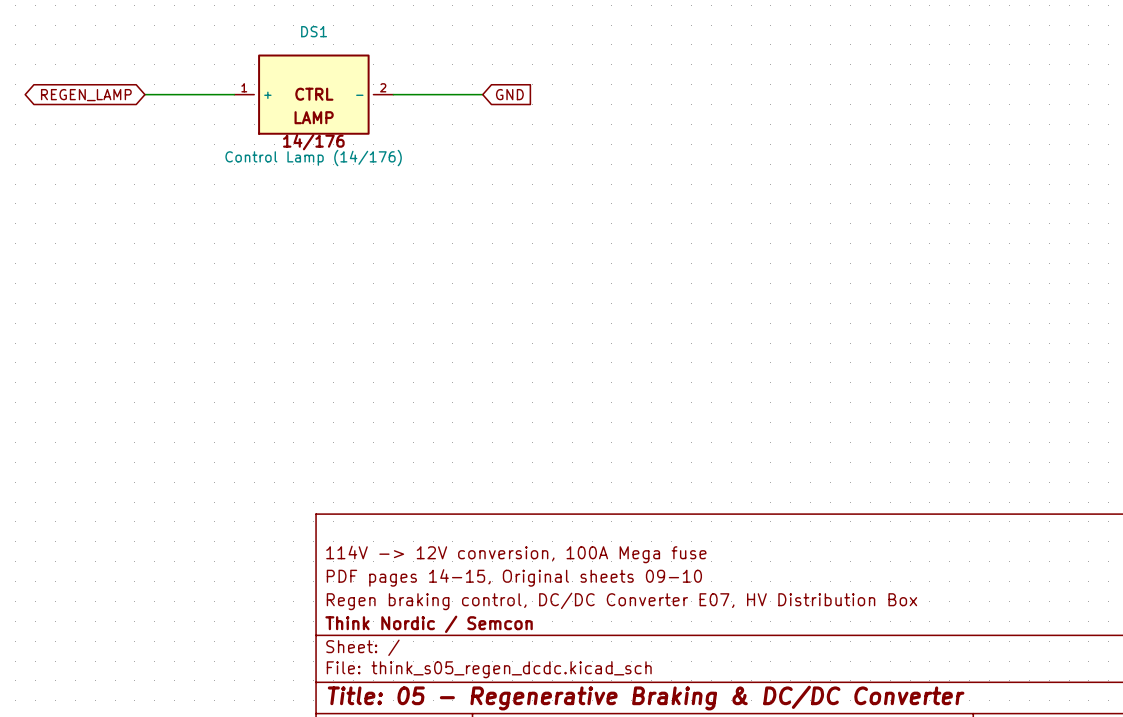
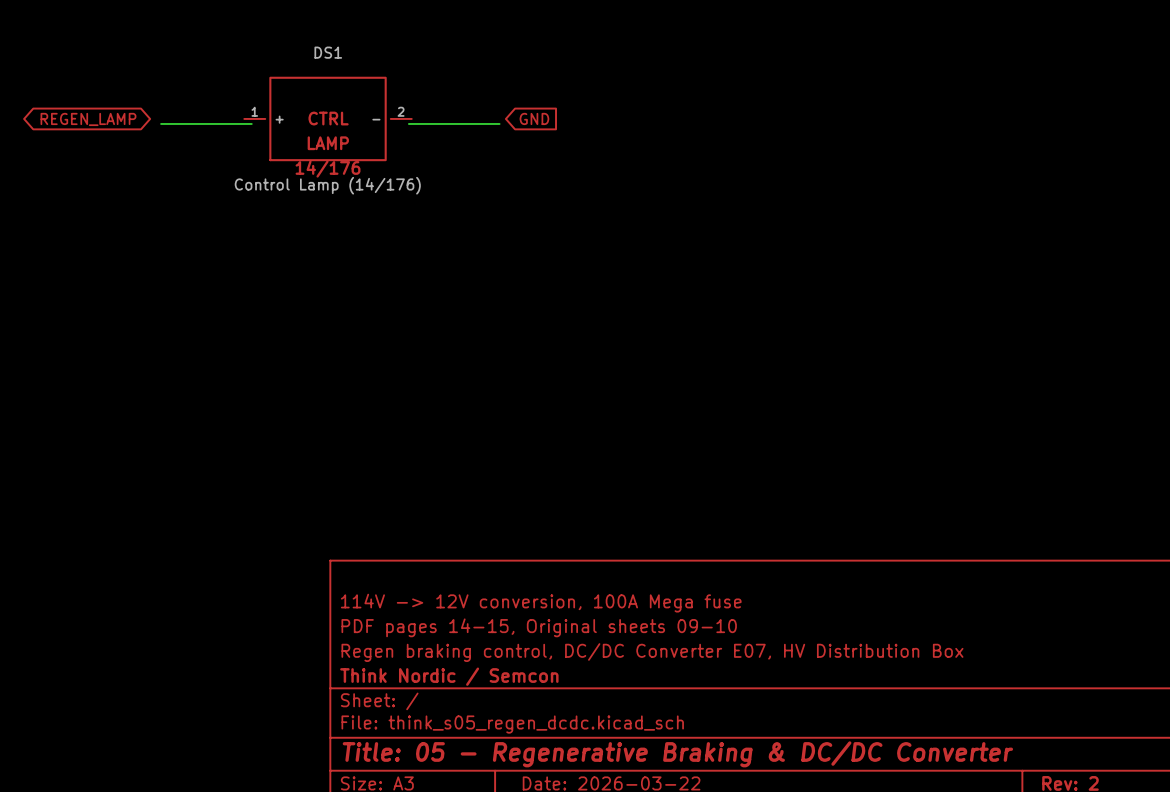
wire: (144, 94) (234, 94) -> none
wire: (393, 94) (482, 94) -> none
wire: none -> (161, 123) (251, 123)
wire: none -> (408, 123) (499, 123)

